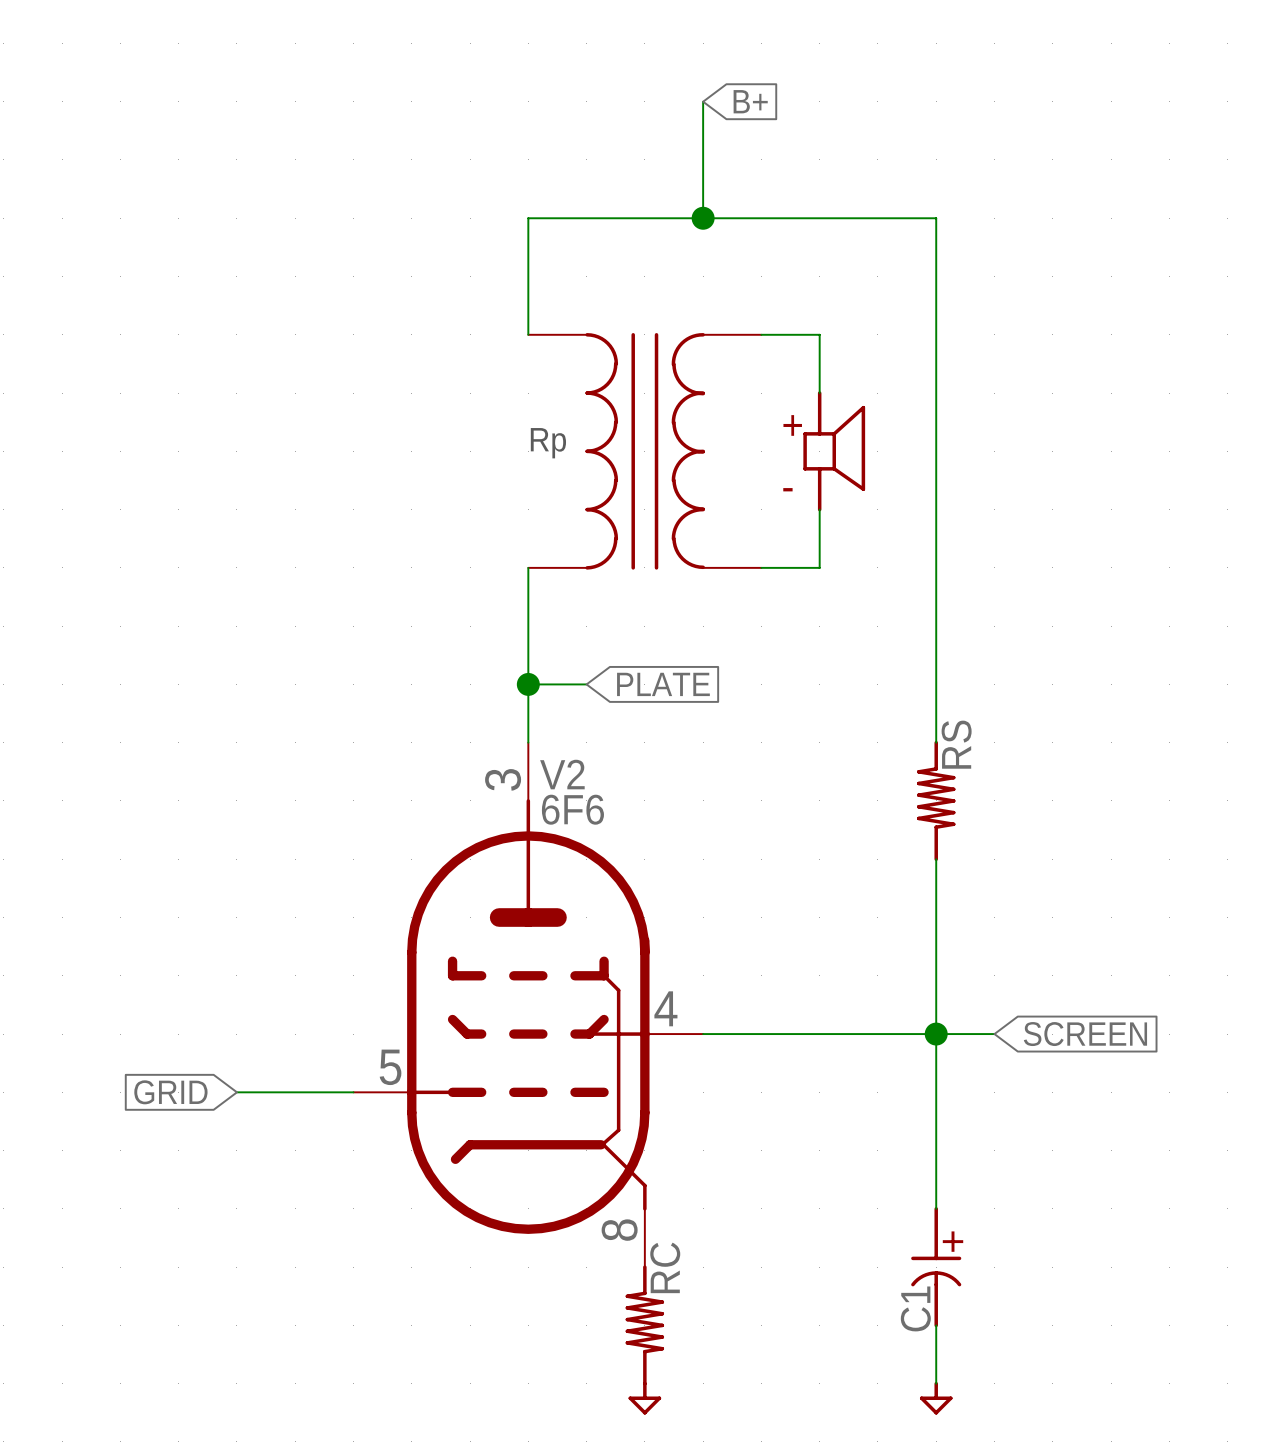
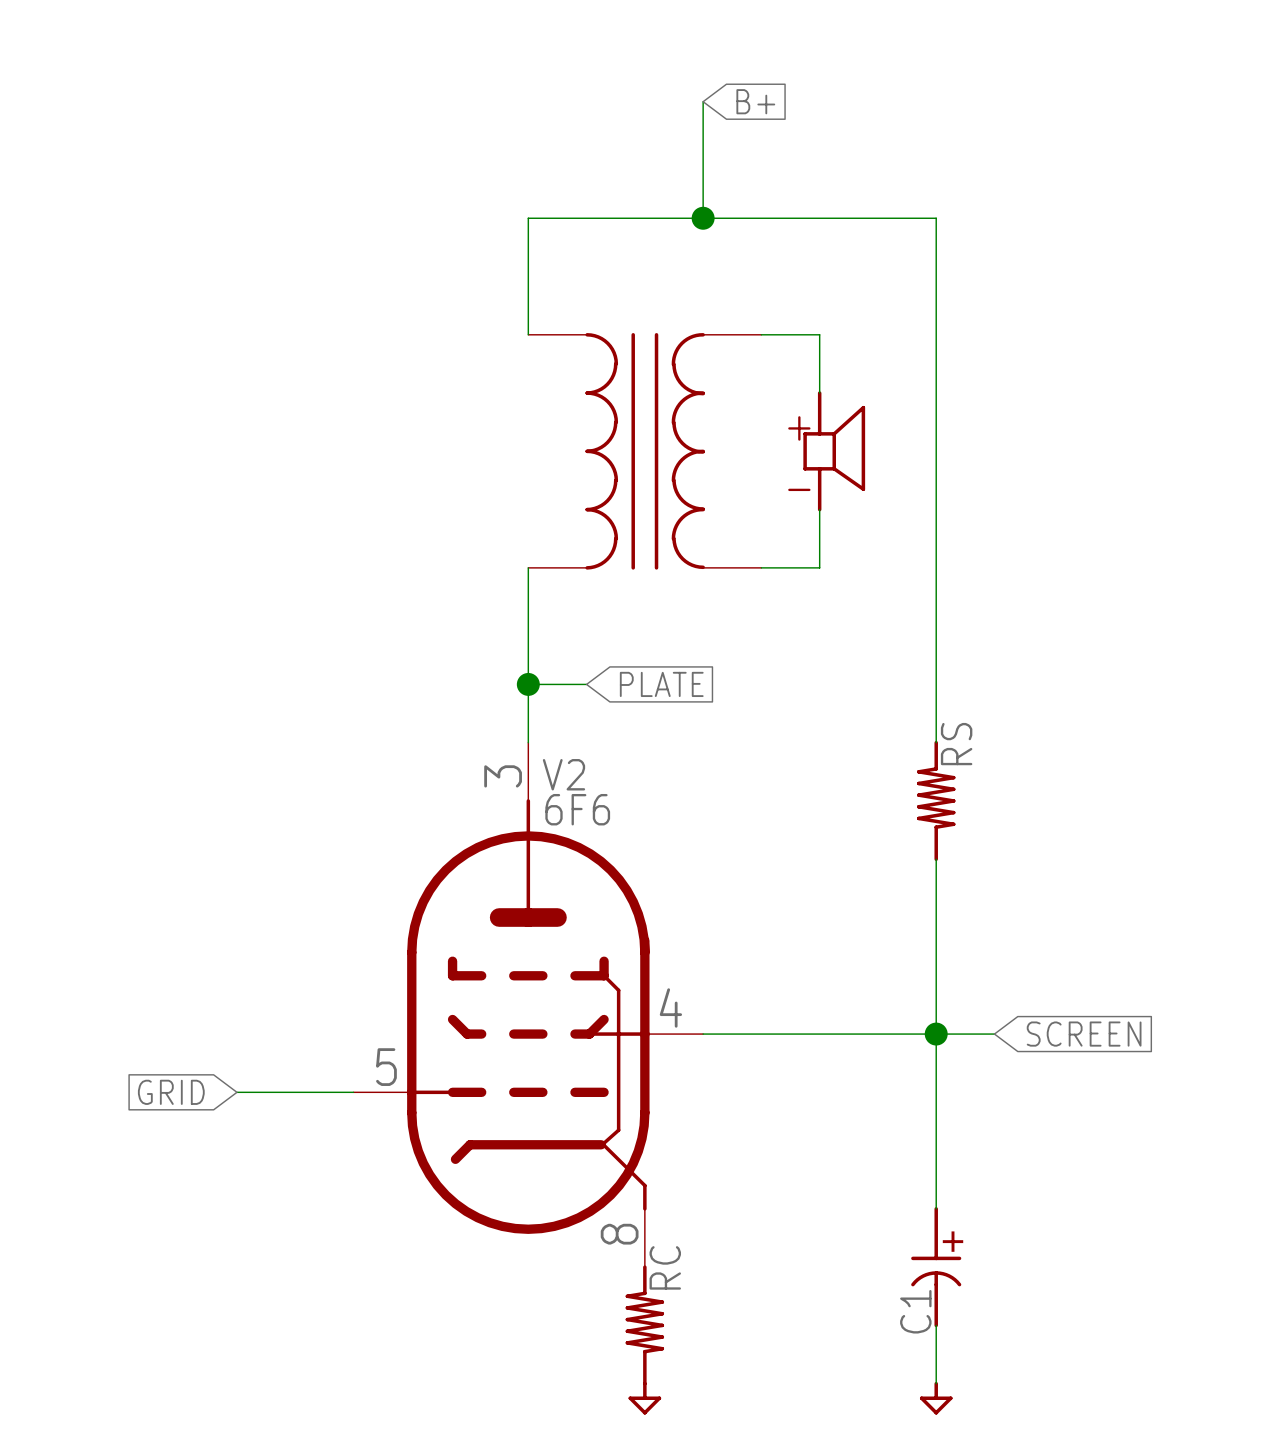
text: Rp (548, 443) -> none

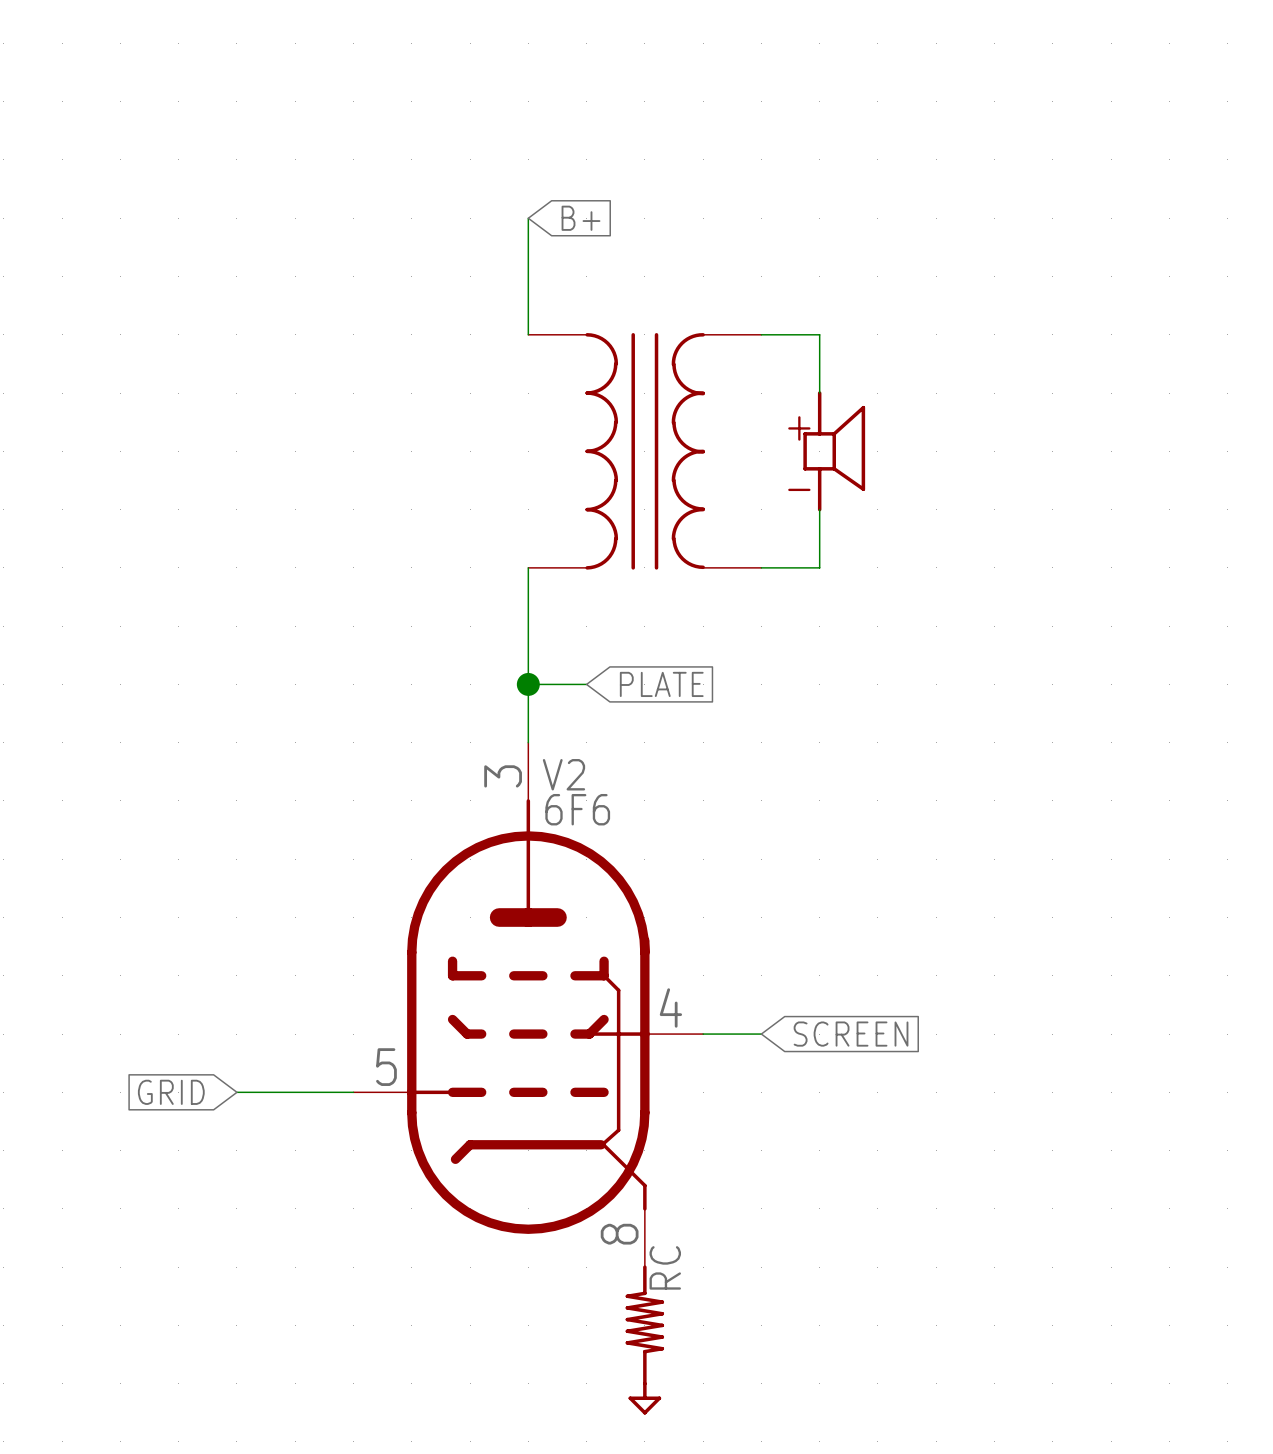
wire: (703, 101) (703, 218) -> none
global label position: B+ (755, 101) -> B+ (580, 218)
wire: (528, 218) (936, 218) (936, 742) -> none
junction: (703, 218) -> none
RS: (936, 800) -> none
wire: (936, 859) (936, 1208) -> none
wire: (761, 1034) (994, 1034) -> none
junction: (936, 1034) -> none
global label position: SCREEN (1084, 1034) -> SCREEN (851, 1034)
C1: (937, 1267) -> none
wire: (936, 1325) (936, 1383) -> none
power symbol: (936, 1398) -> none

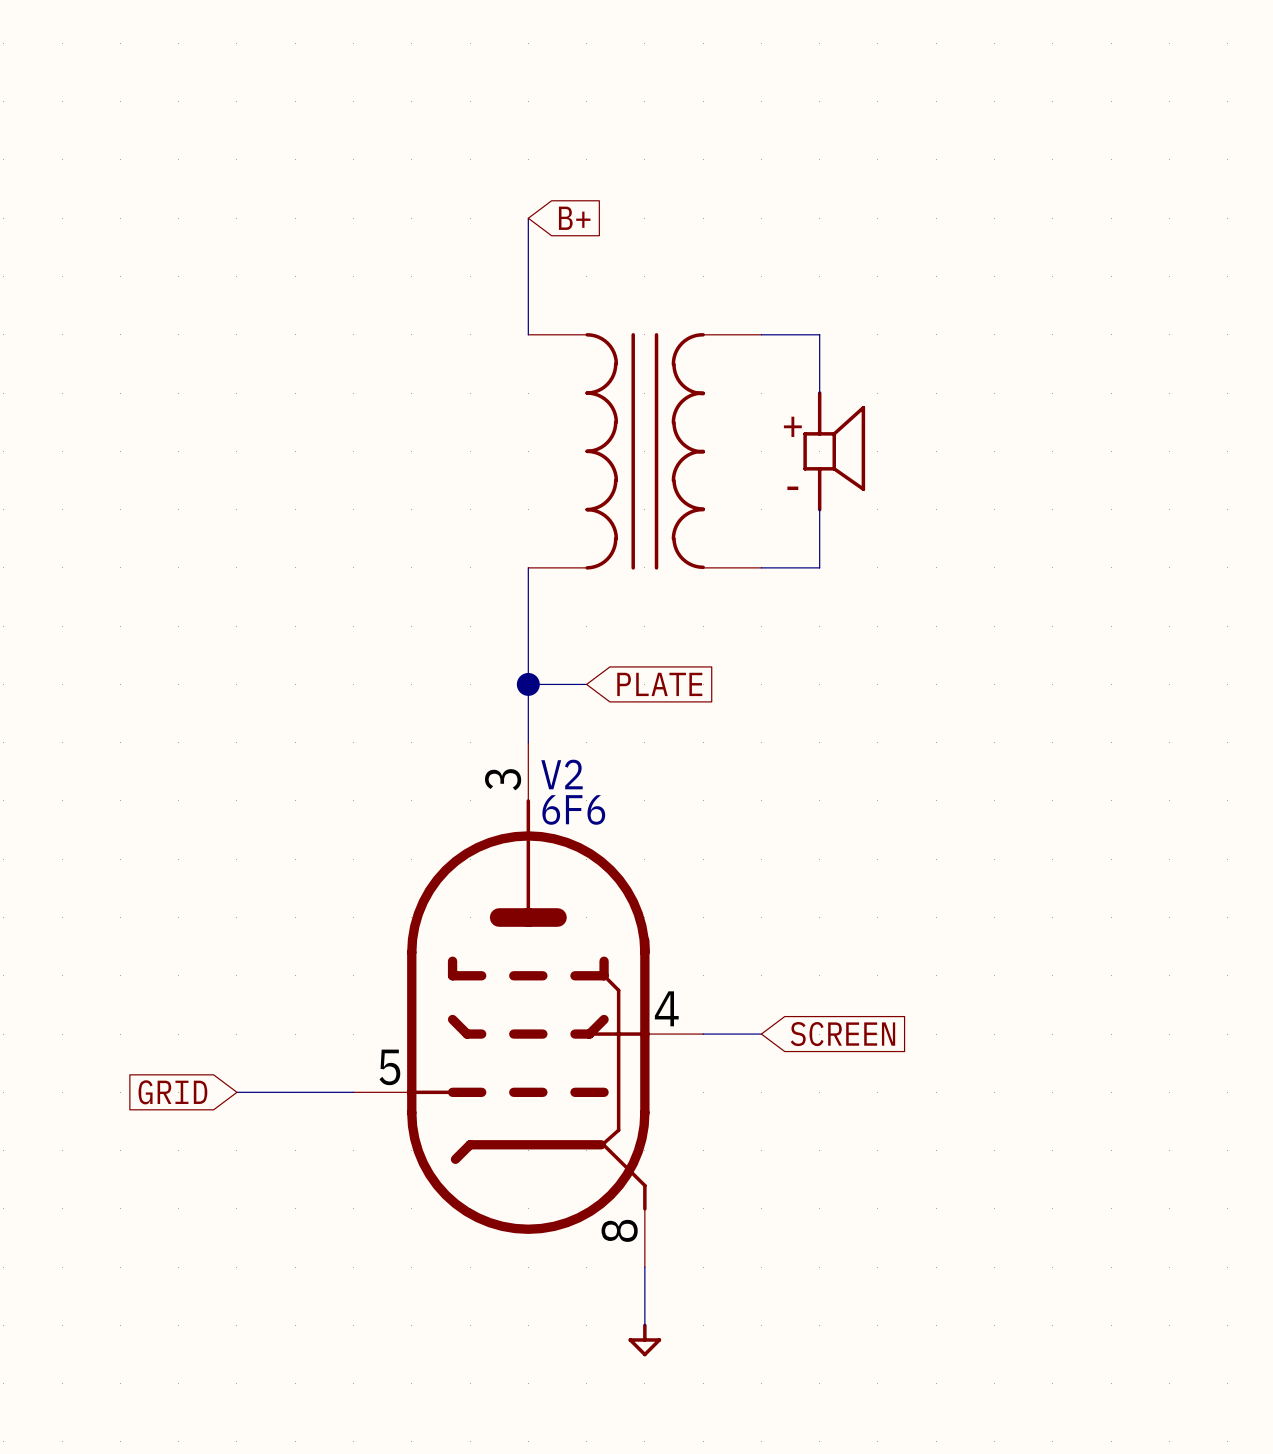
RC: (644, 1325) -> none
power symbol position: (644, 1398) -> (644, 1339)

